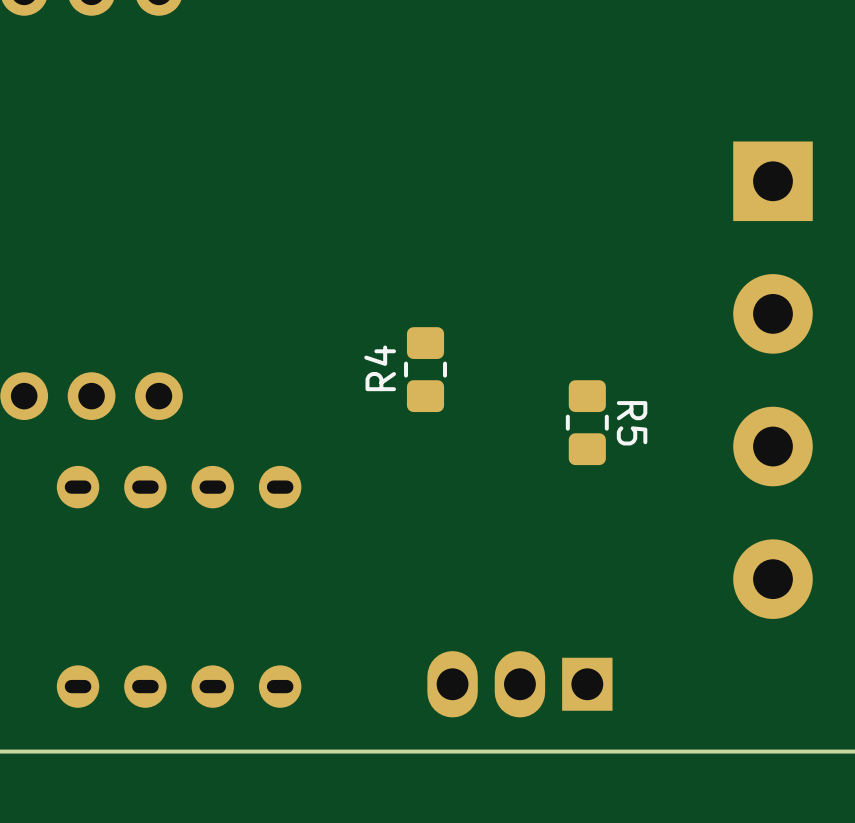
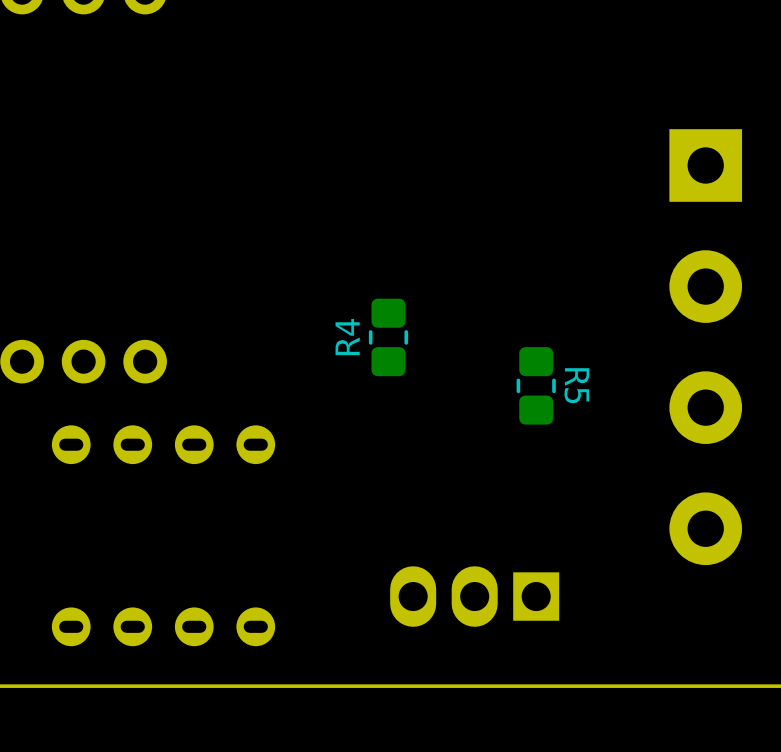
part: none -> (474, 596)
part: (519, 684) -> none

